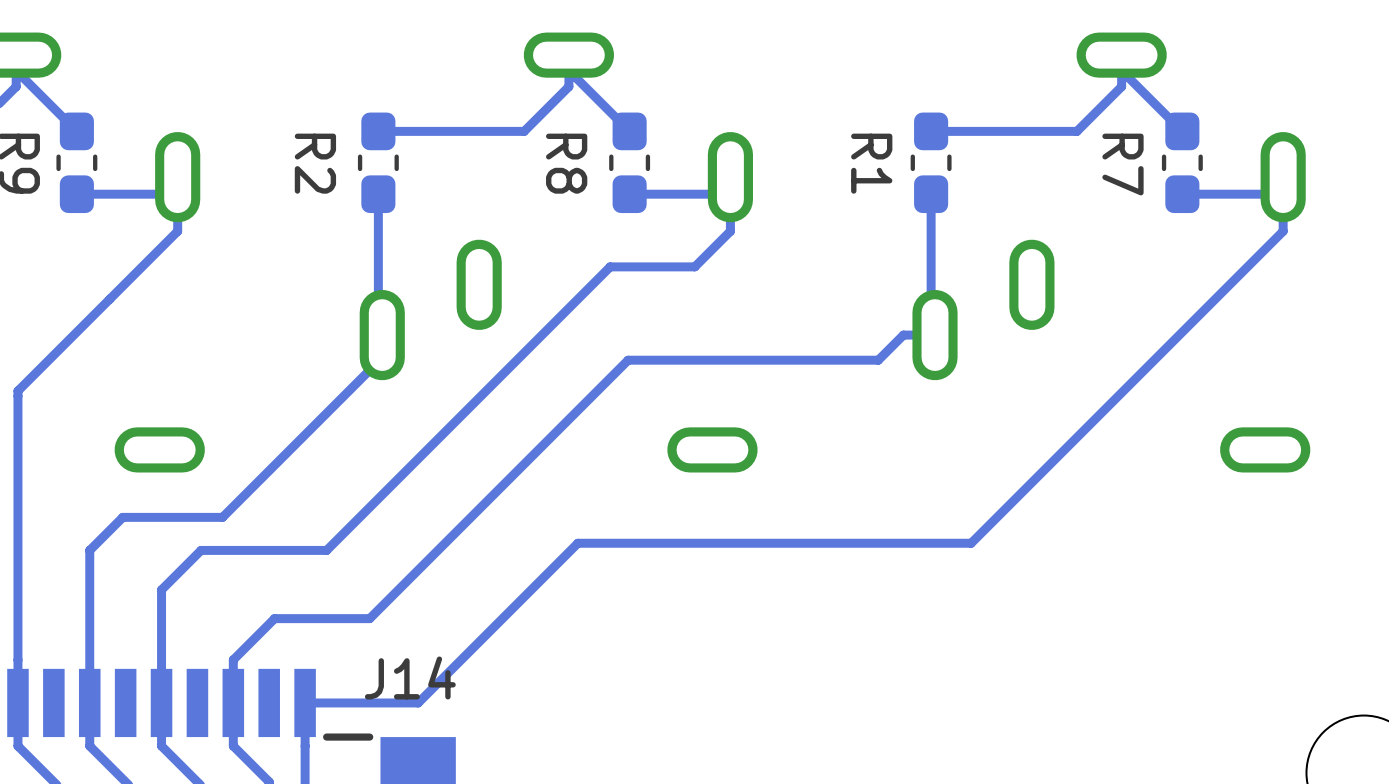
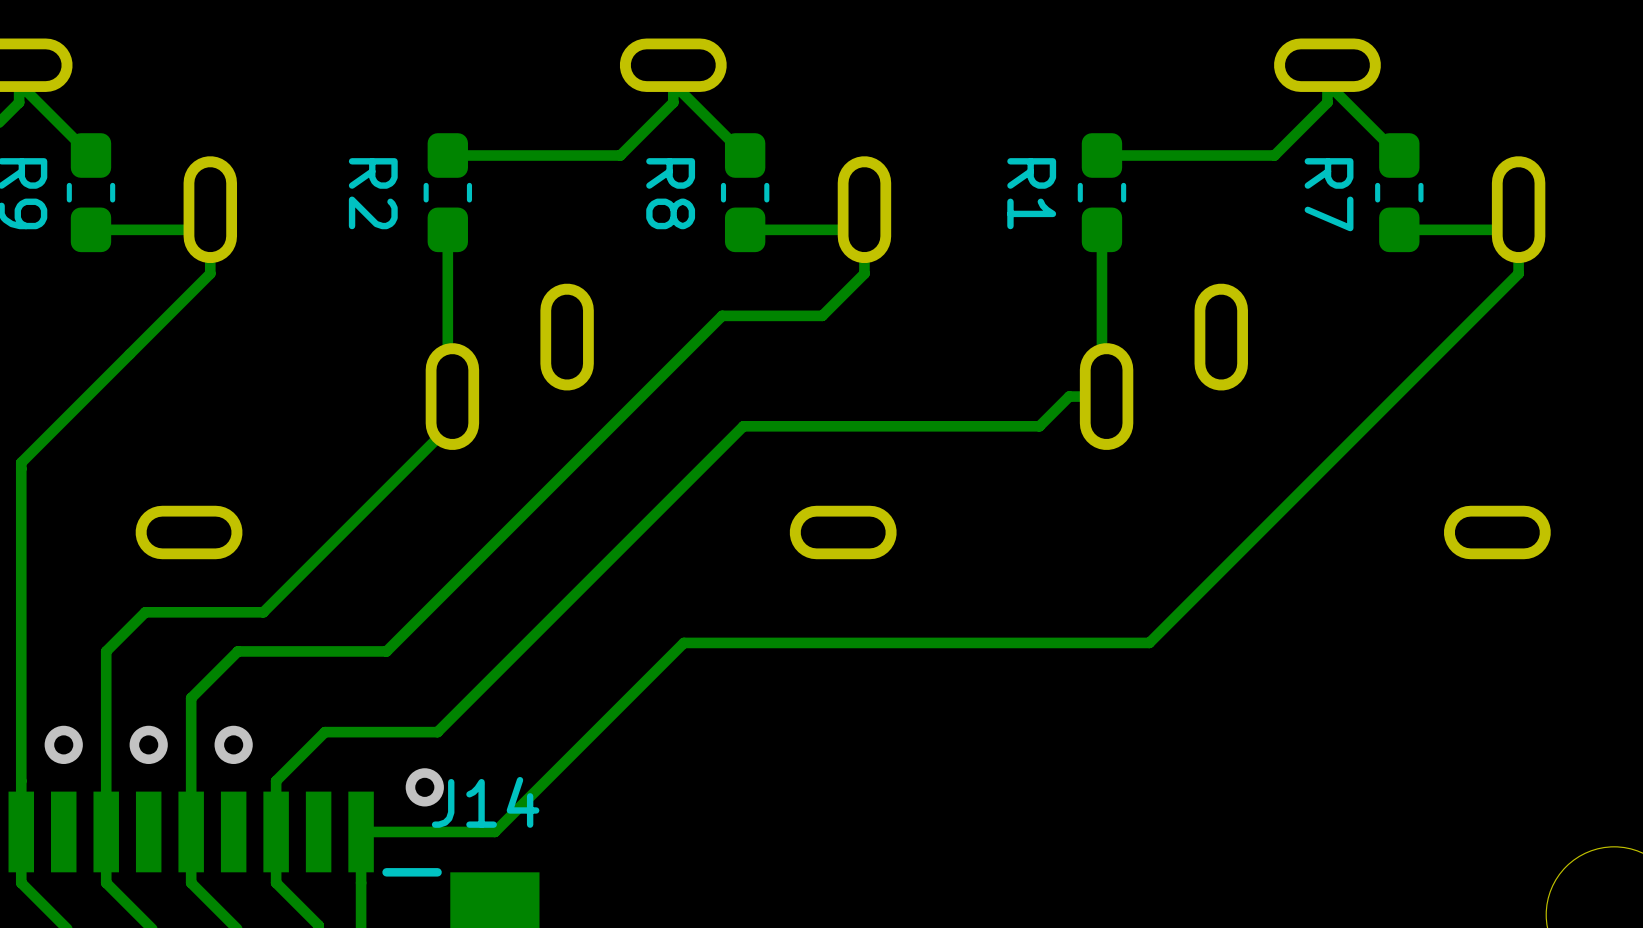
via: none -> (63, 744)
via: none -> (148, 744)
via: none -> (233, 744)
via: none -> (424, 787)

